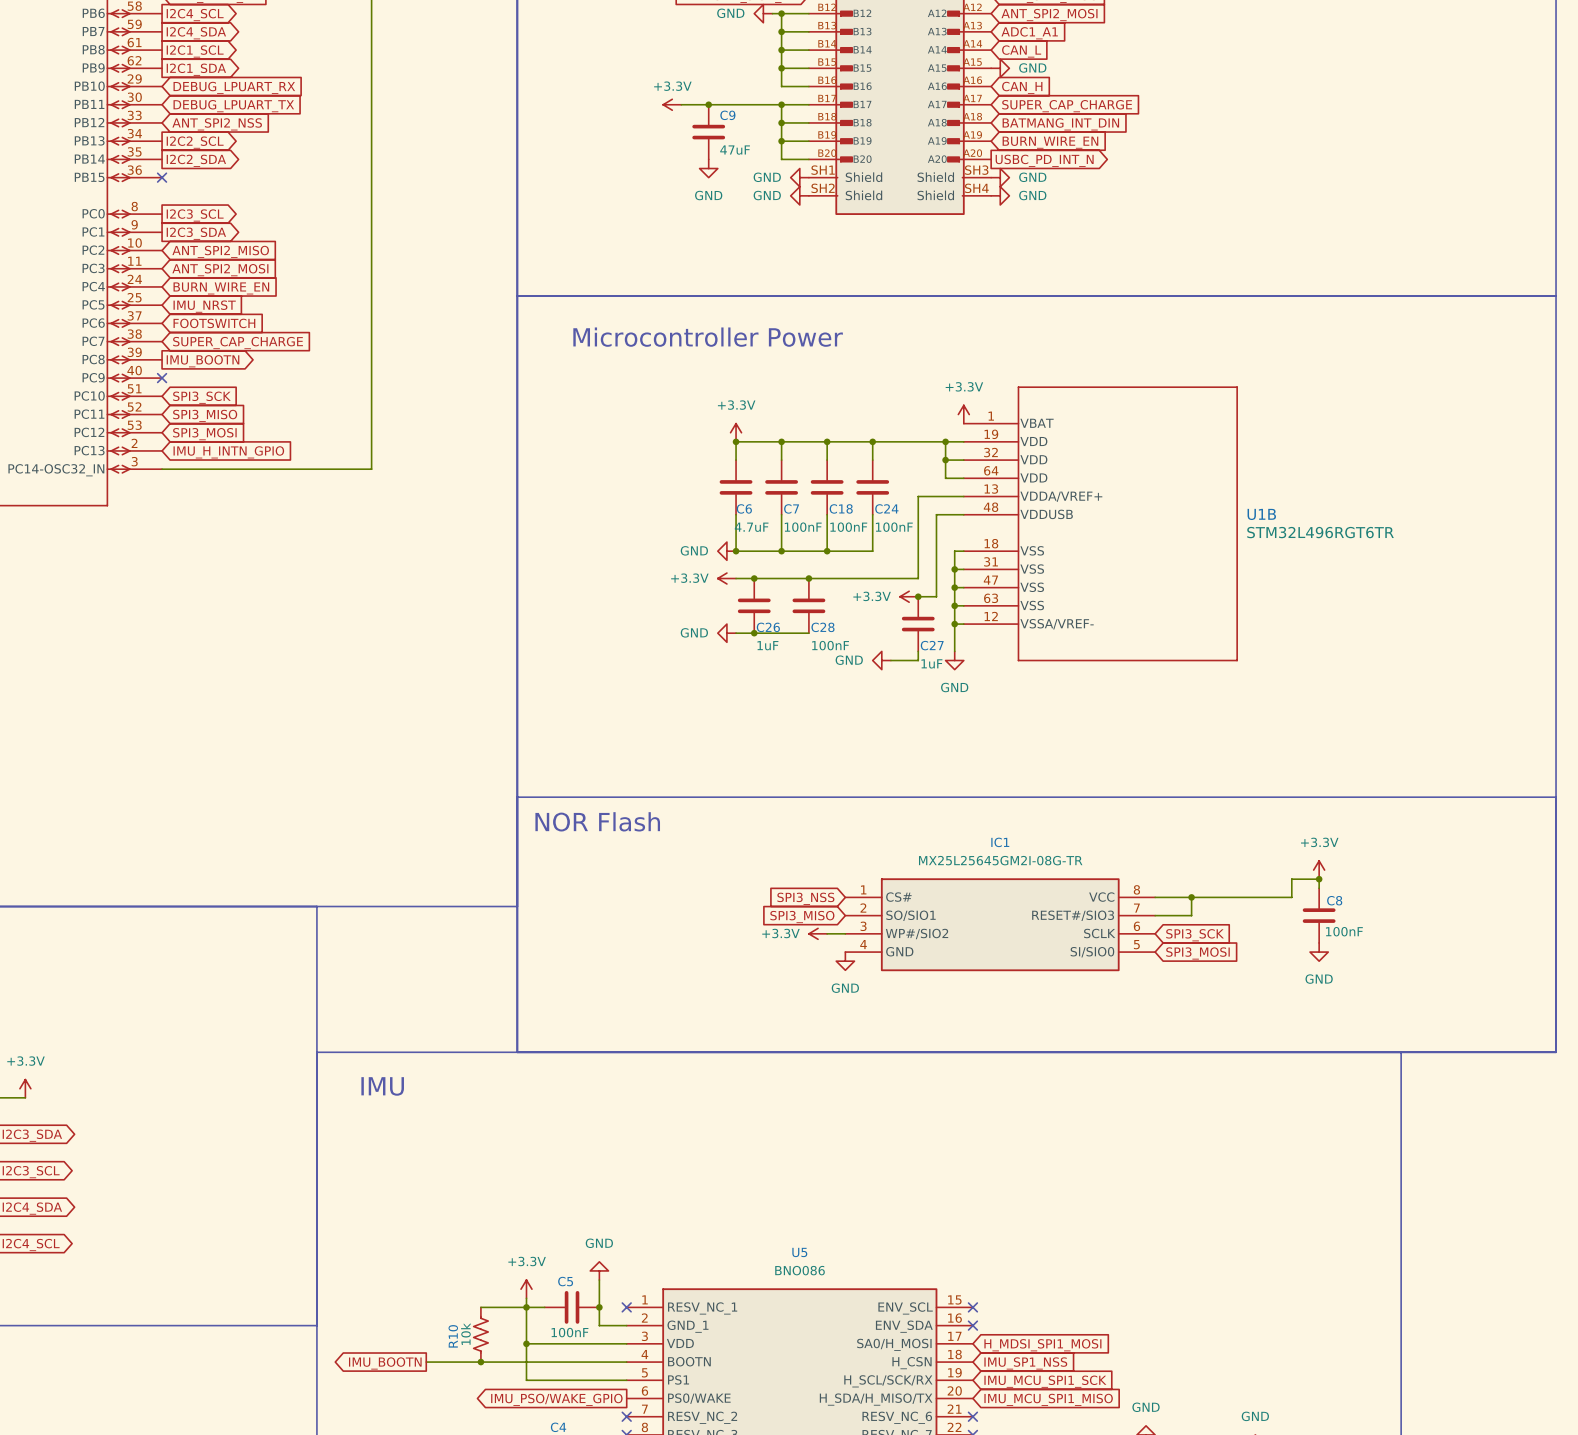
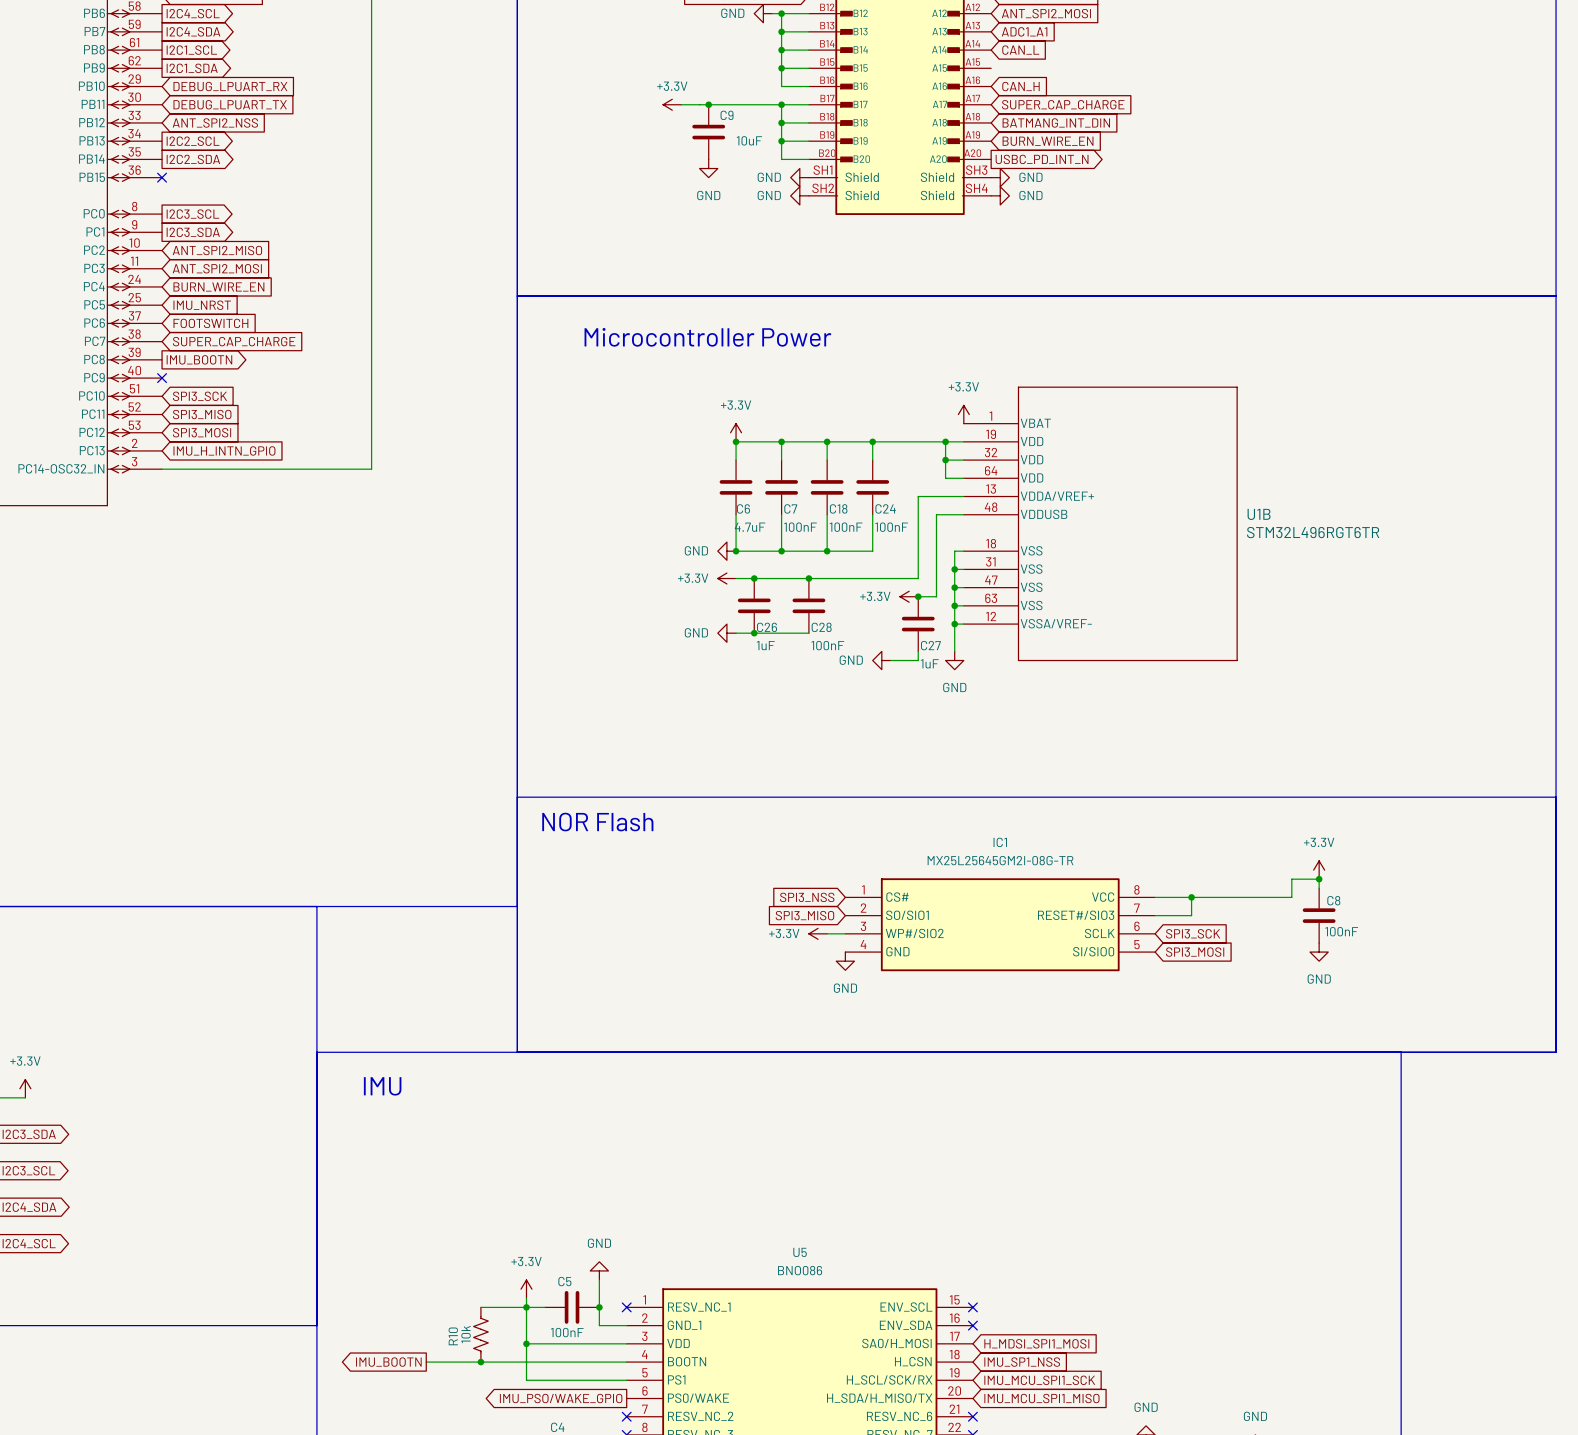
power symbol: GND (1000, 68) -> none
C9 value: 47uF (735, 150) -> 10uF (749, 140)

